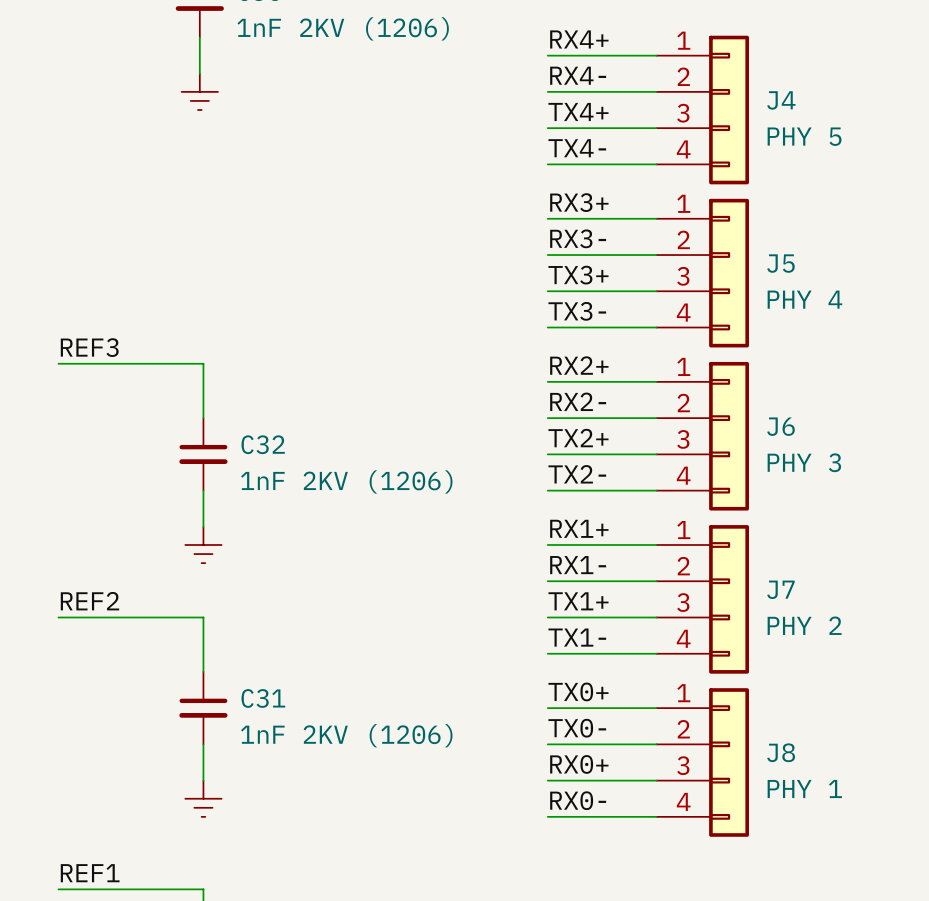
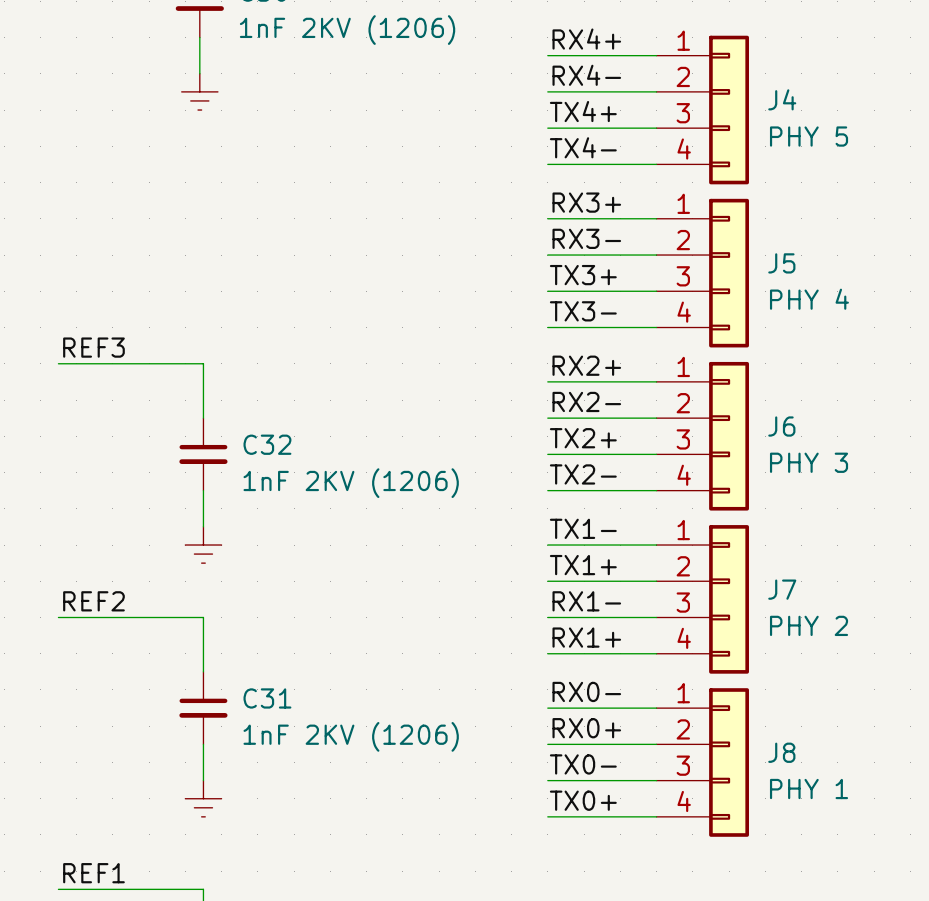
label: RX1+ (579, 528) -> TX1- (583, 528)
label: RX1- (578, 565) -> TX1+ (583, 565)
label: TX1+ (578, 601) -> RX1- (586, 601)
label: TX1- (577, 637) -> RX1+ (586, 637)
label: TX0+ (578, 691) -> RX0- (586, 691)
label: TX0- (577, 728) -> RX0+ (586, 728)
label: RX0+ (579, 764) -> TX0- (583, 764)
label: RX0- (578, 800) -> TX0+ (583, 800)

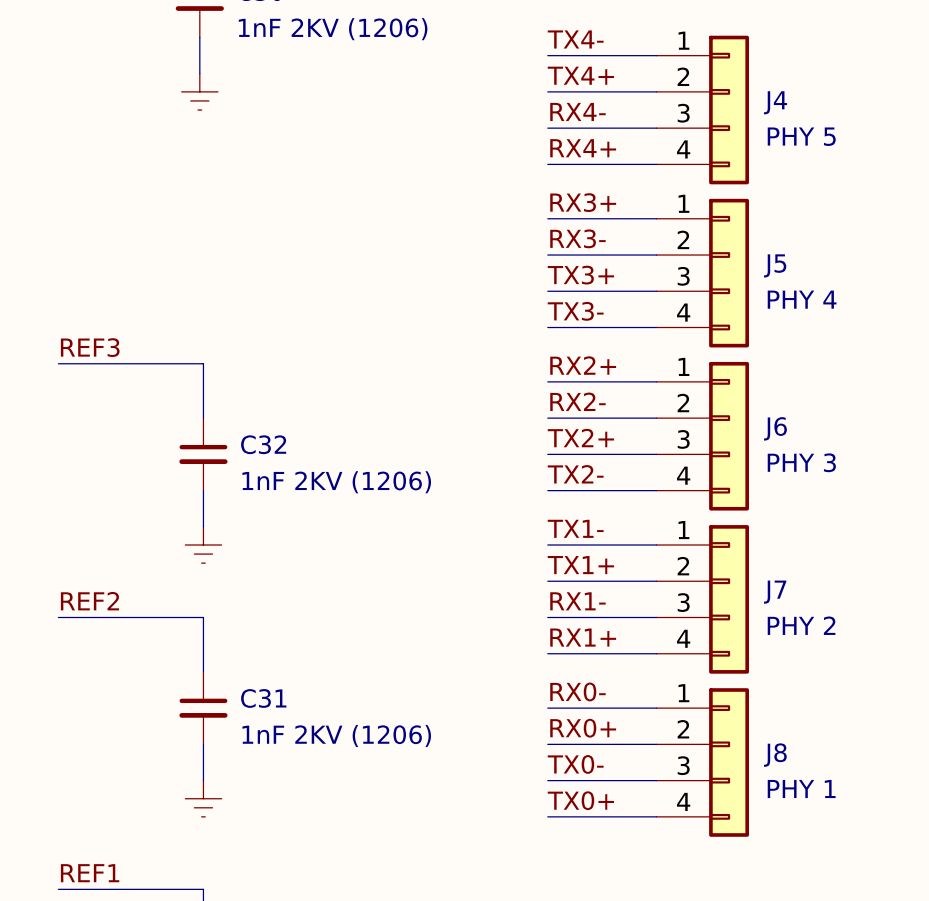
label: RX4+ (586, 39) -> TX4- (575, 39)
label: RX4- (586, 75) -> TX4+ (580, 75)
label: TX4+ (583, 111) -> RX4- (577, 111)
label: TX4- (583, 147) -> RX4+ (583, 148)

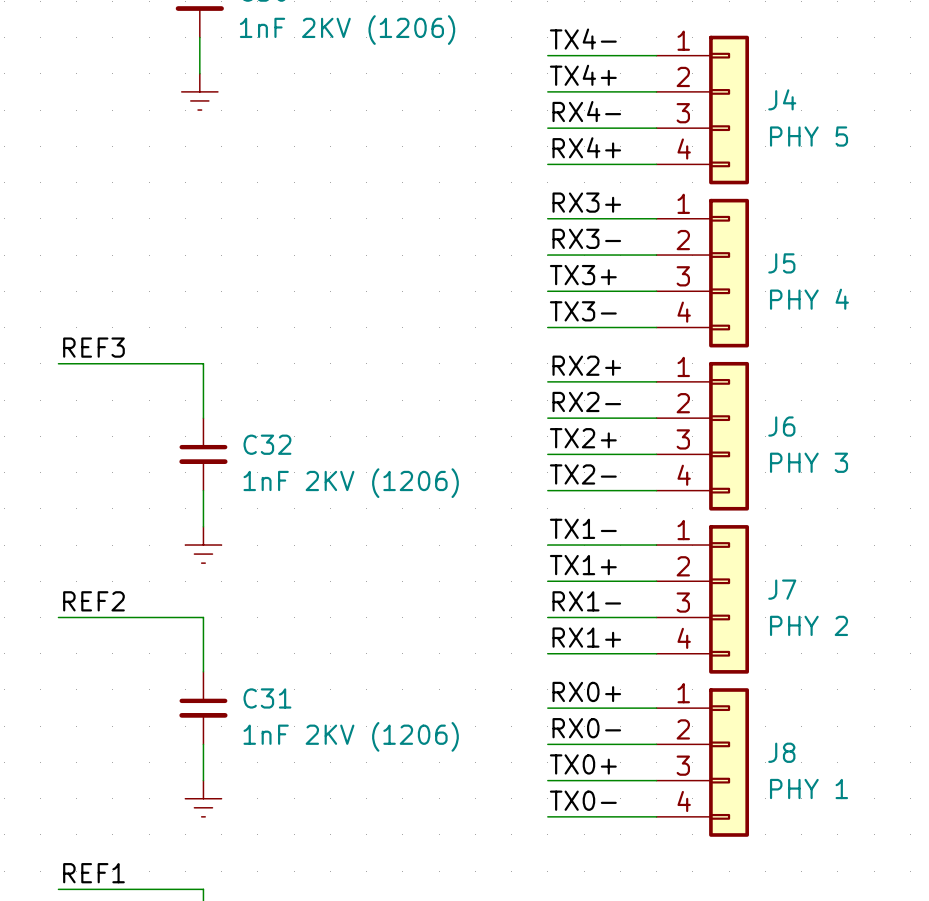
label: RX0- (577, 691) -> RX0+ (586, 691)
label: RX0+ (583, 728) -> RX0- (586, 728)
label: TX0- (575, 764) -> TX0+ (583, 764)
label: TX0+ (580, 800) -> TX0- (583, 800)

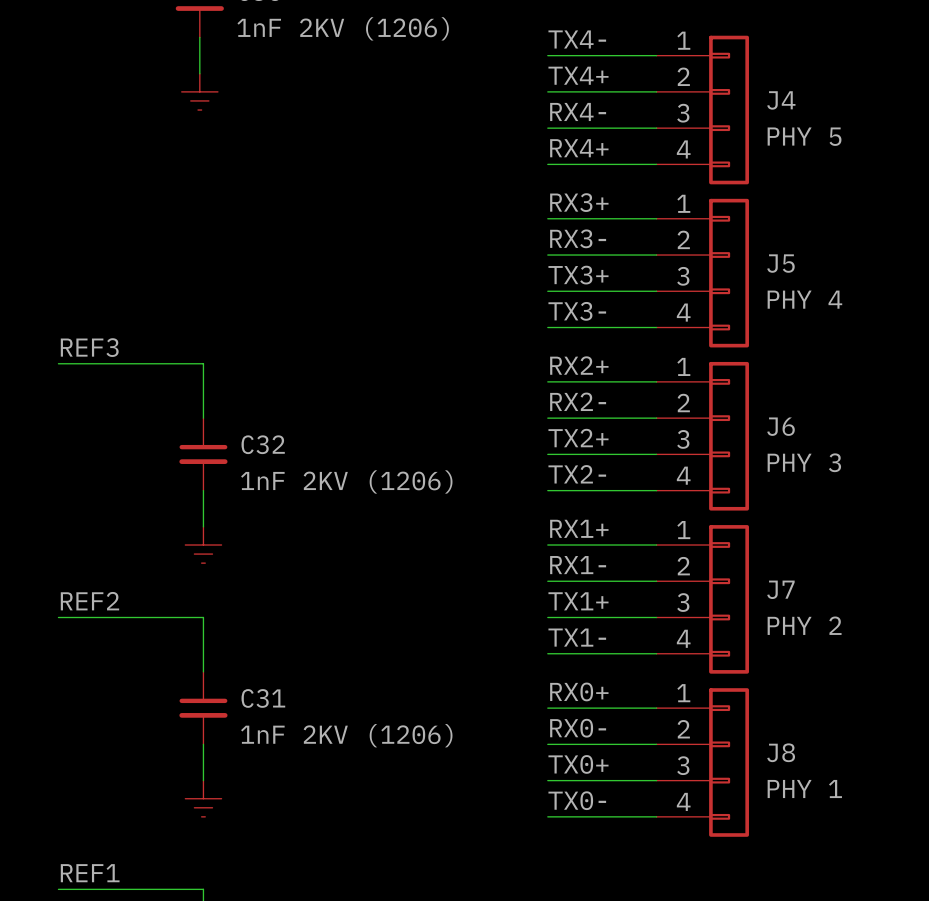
label: TX1- (583, 528) -> RX1+ (579, 528)
label: TX1+ (583, 565) -> RX1- (578, 565)
label: RX1- (586, 601) -> TX1+ (578, 601)
label: RX1+ (586, 637) -> TX1- (577, 637)

